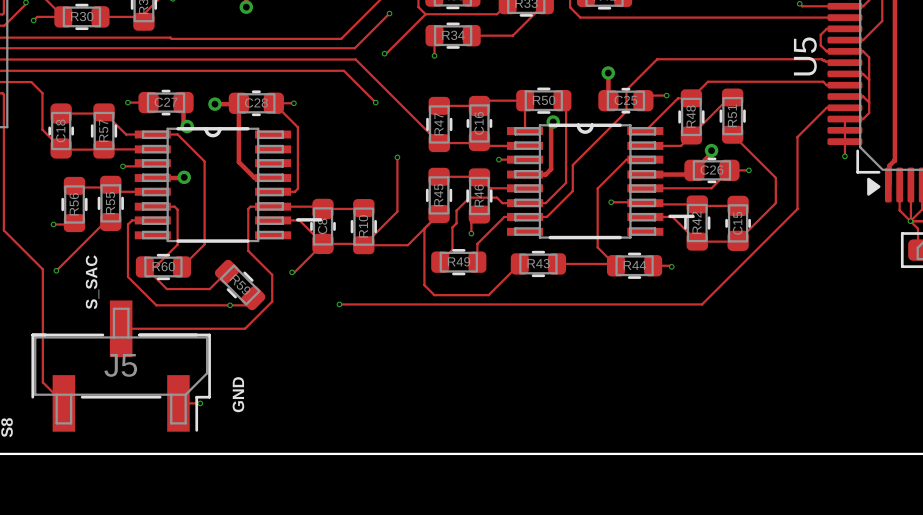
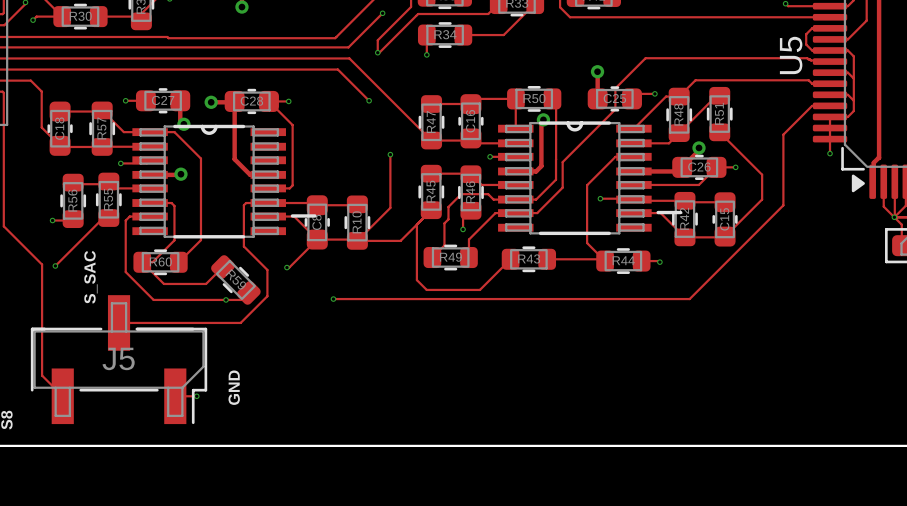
track: (418, 7) (425, 14) -> (411, 6) (377, 40) (377, 52)

